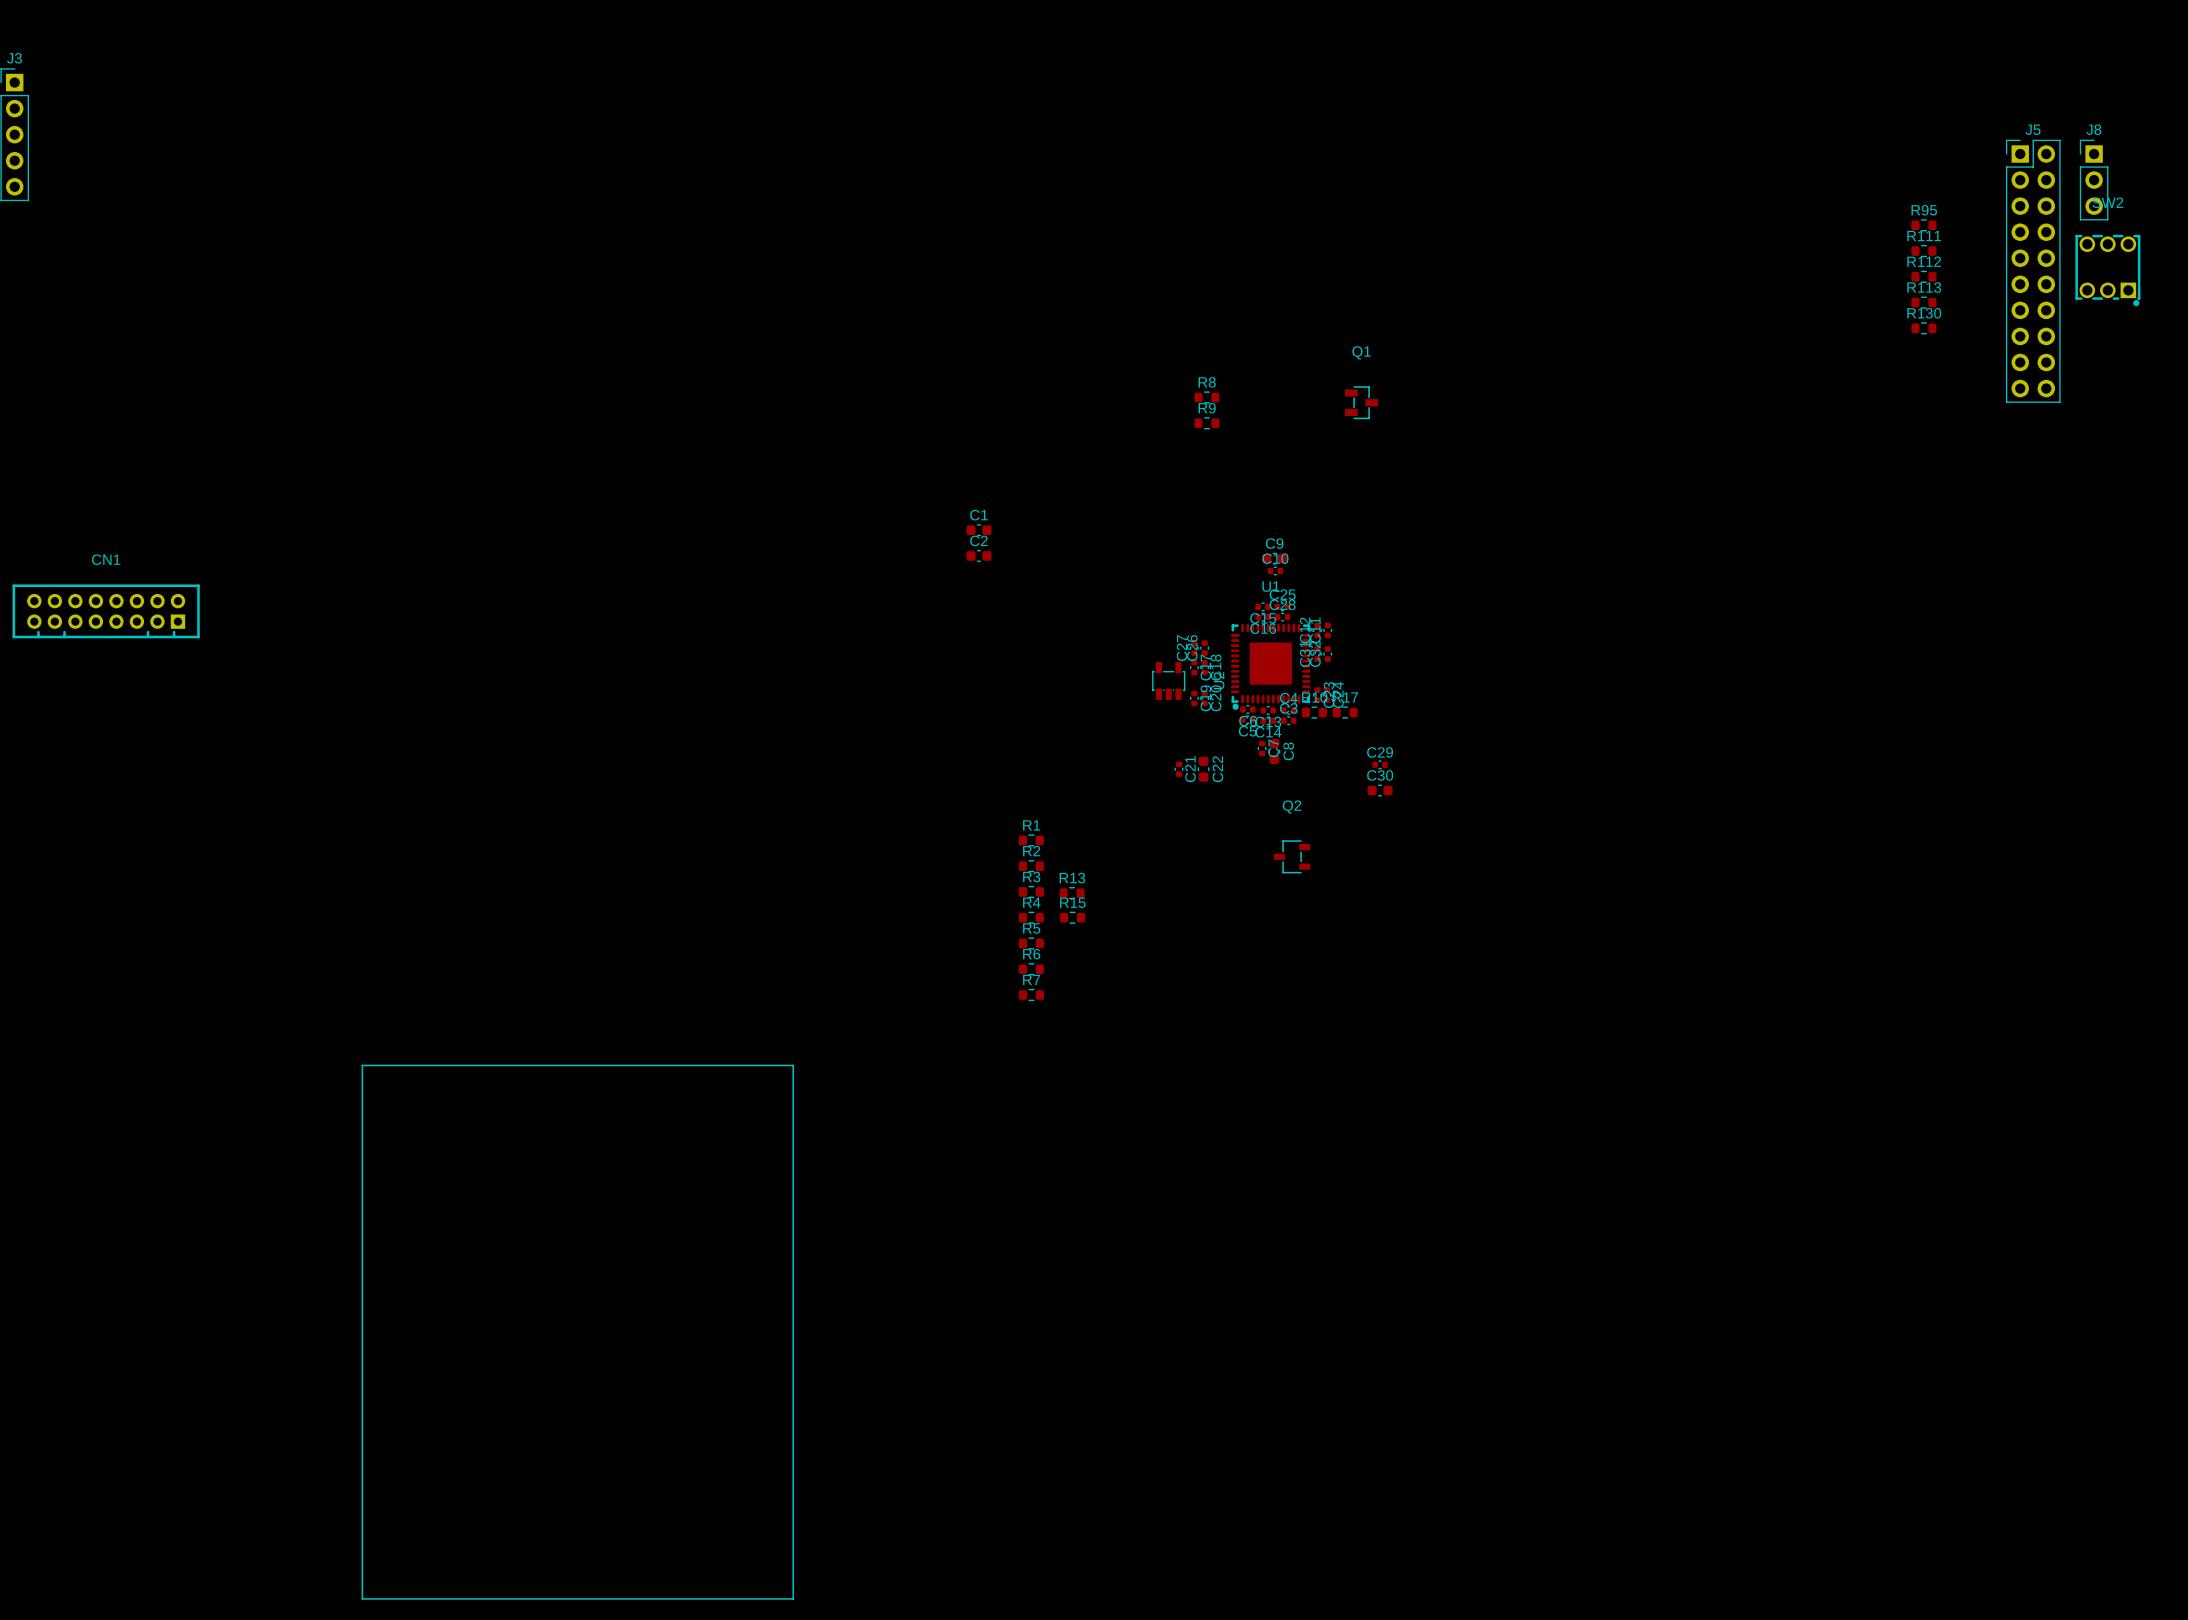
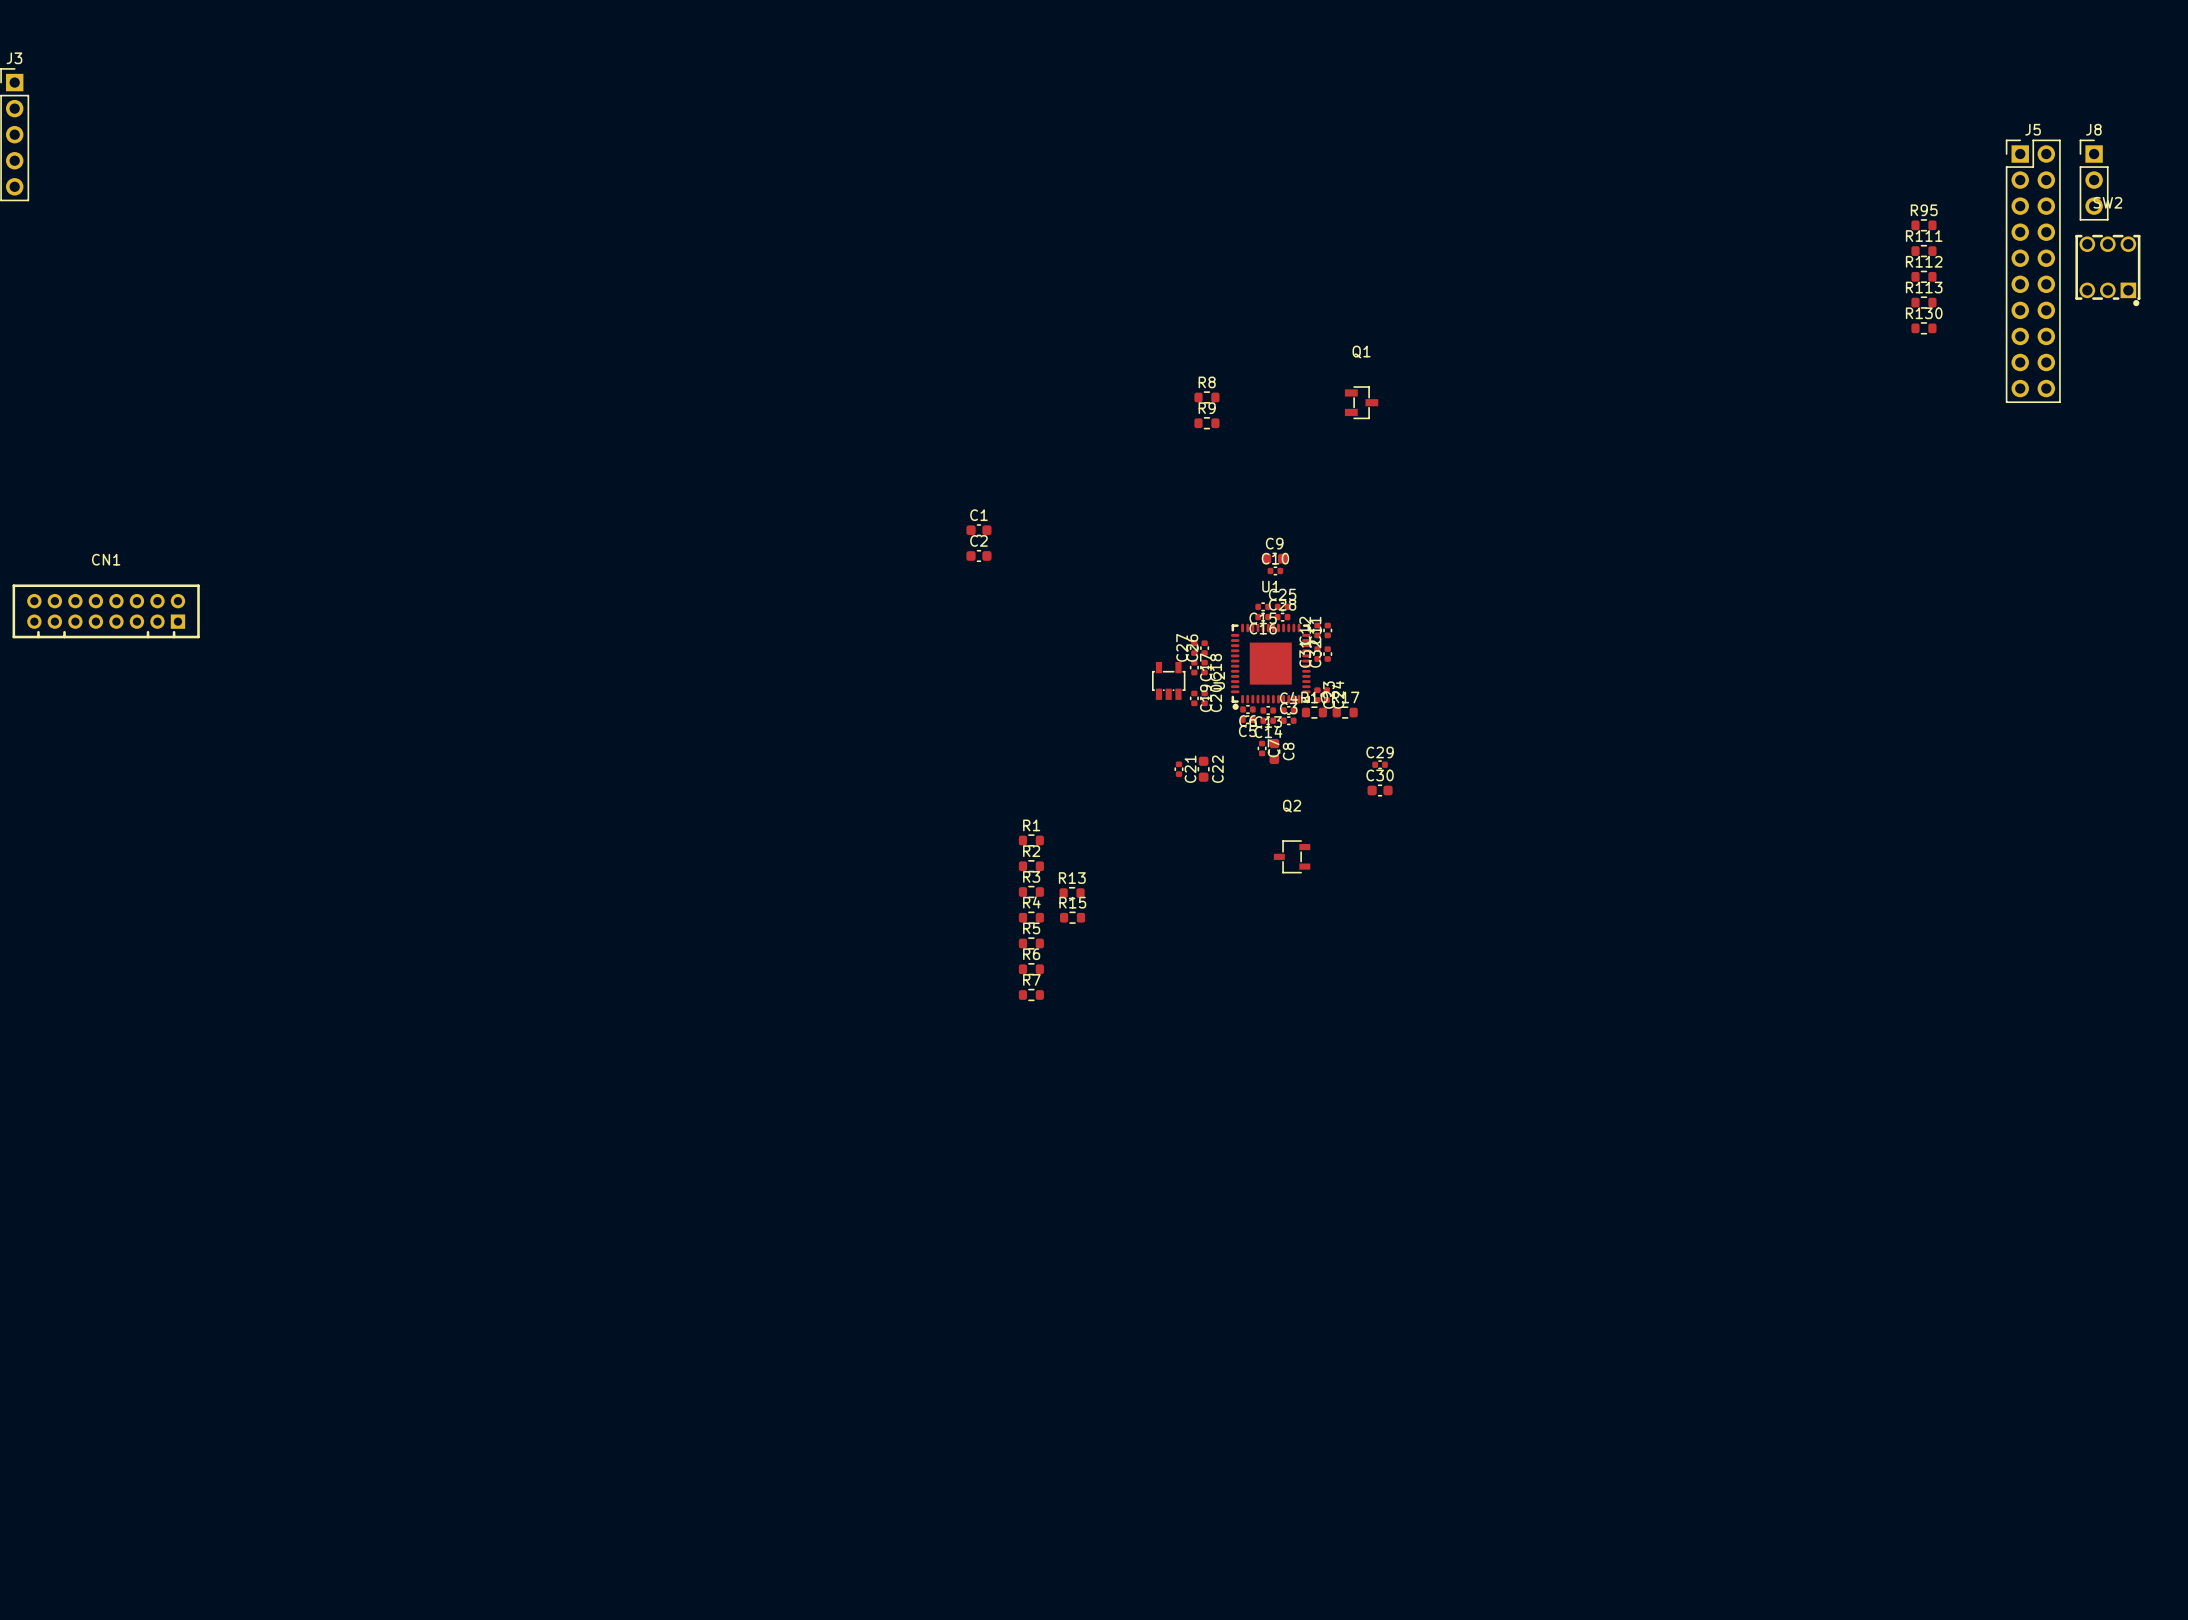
line: (362, 1065) (793, 1065) (793, 1598) (362, 1598) (362, 1065) -> none

